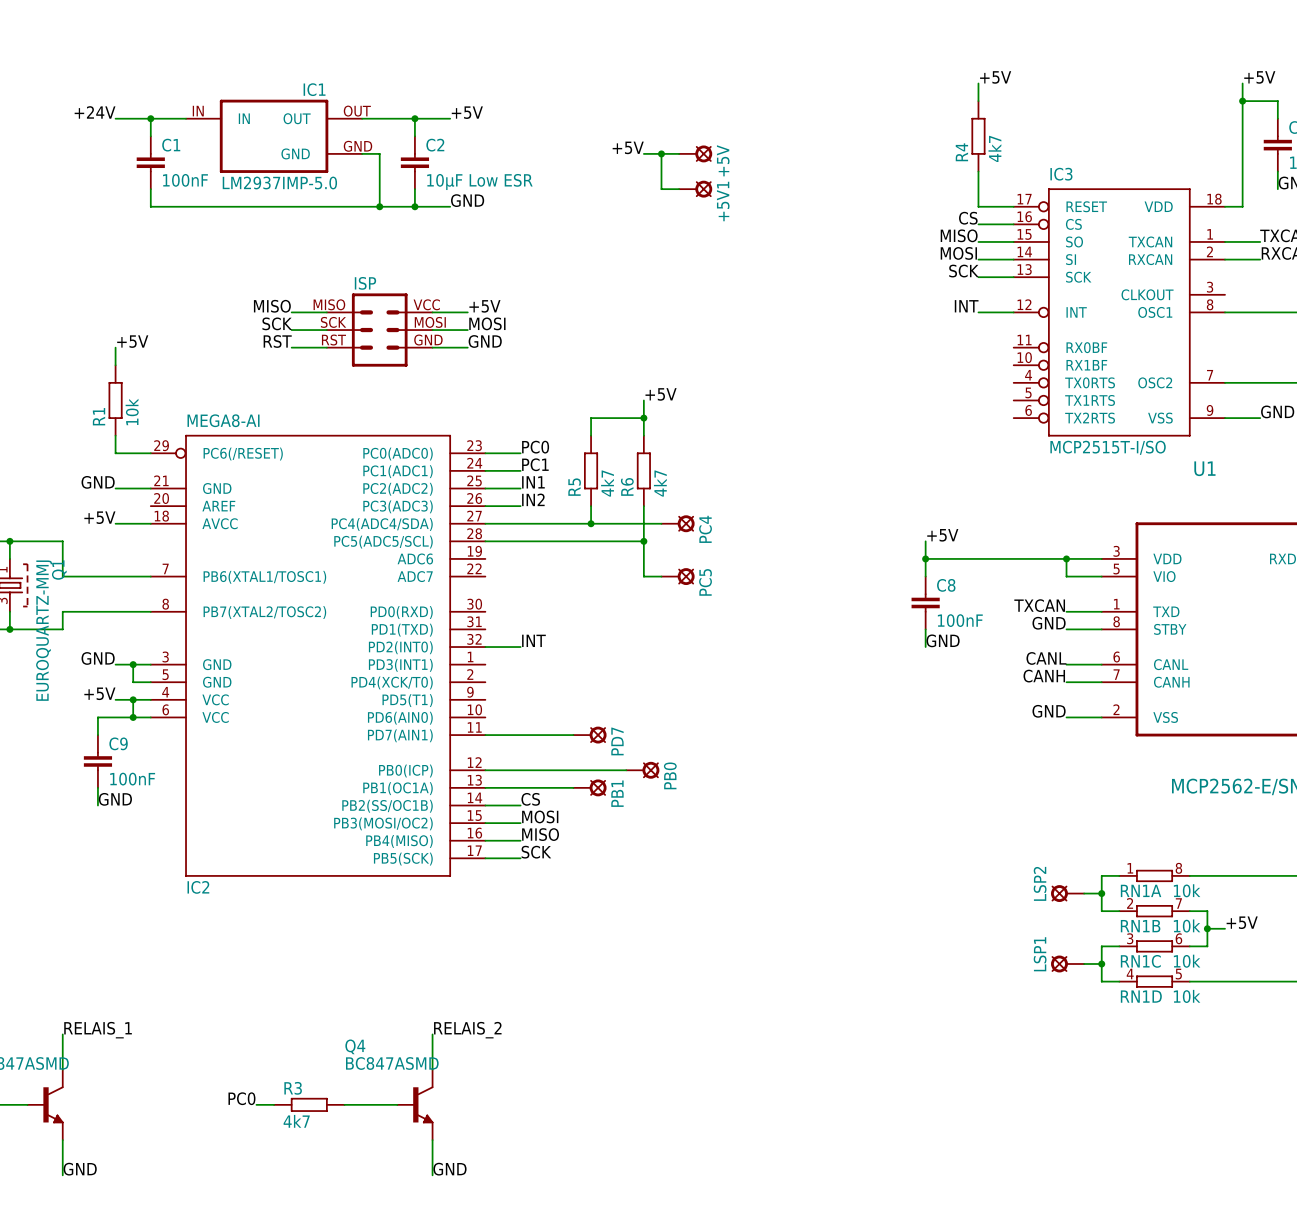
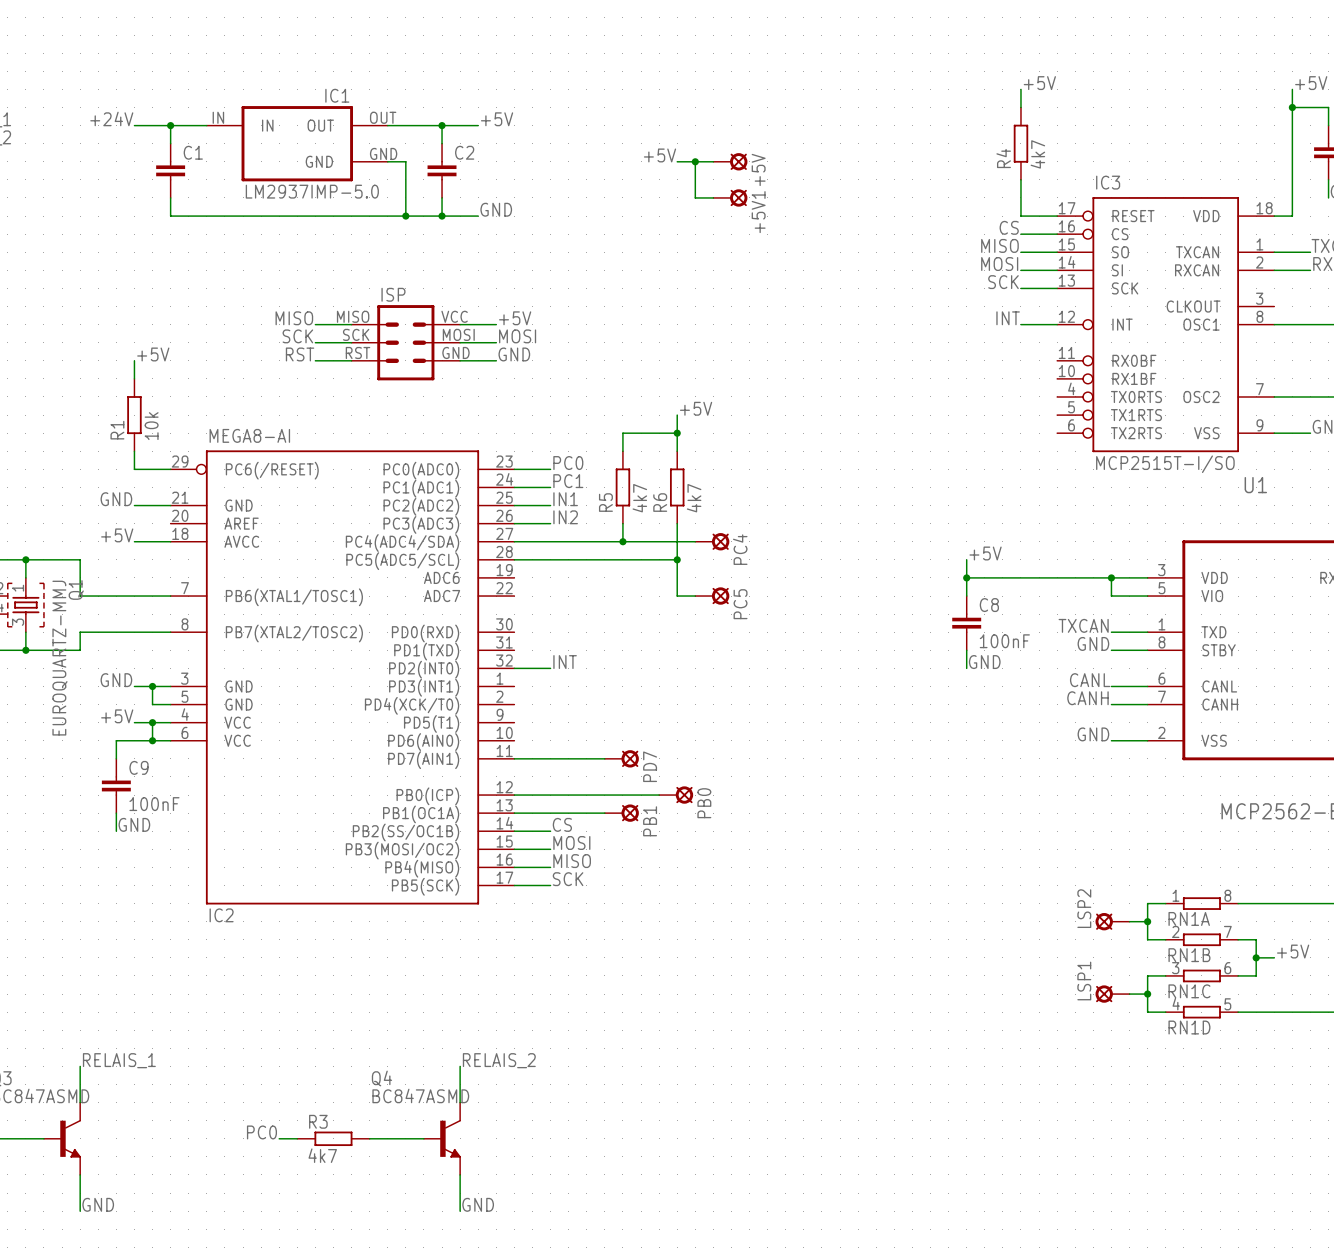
C1 value: 100nF (185, 180) -> none
C2 value: 10µF Low ESR (479, 181) -> none
RN1A value: 10k (1187, 890) -> none
RN1B value: 10k (1187, 925) -> none
RN1C value: 10k (1187, 961) -> none
RN1D value: 10k (1187, 996) -> none

